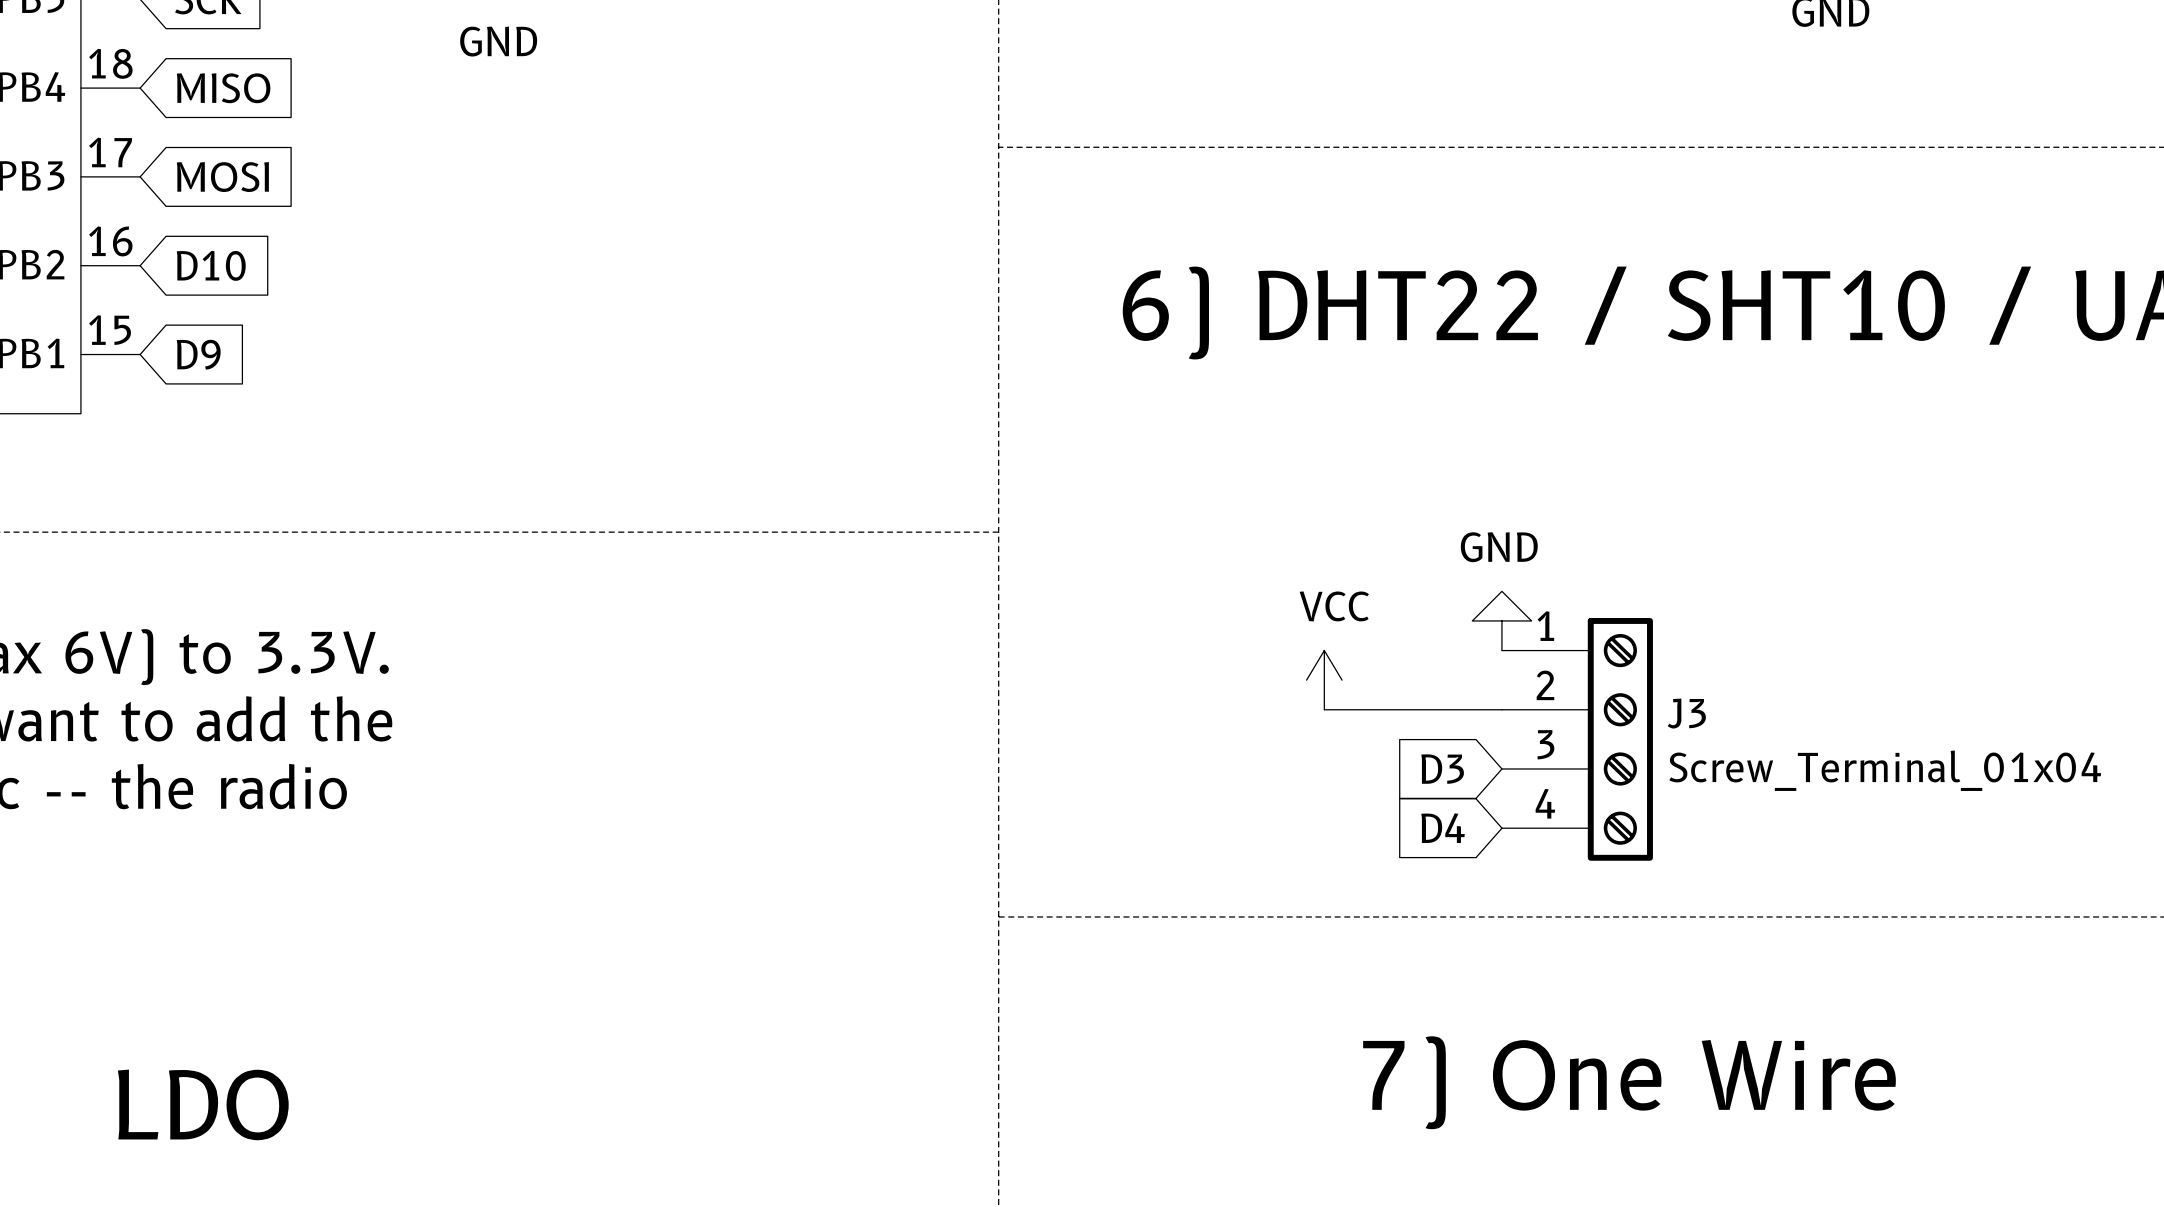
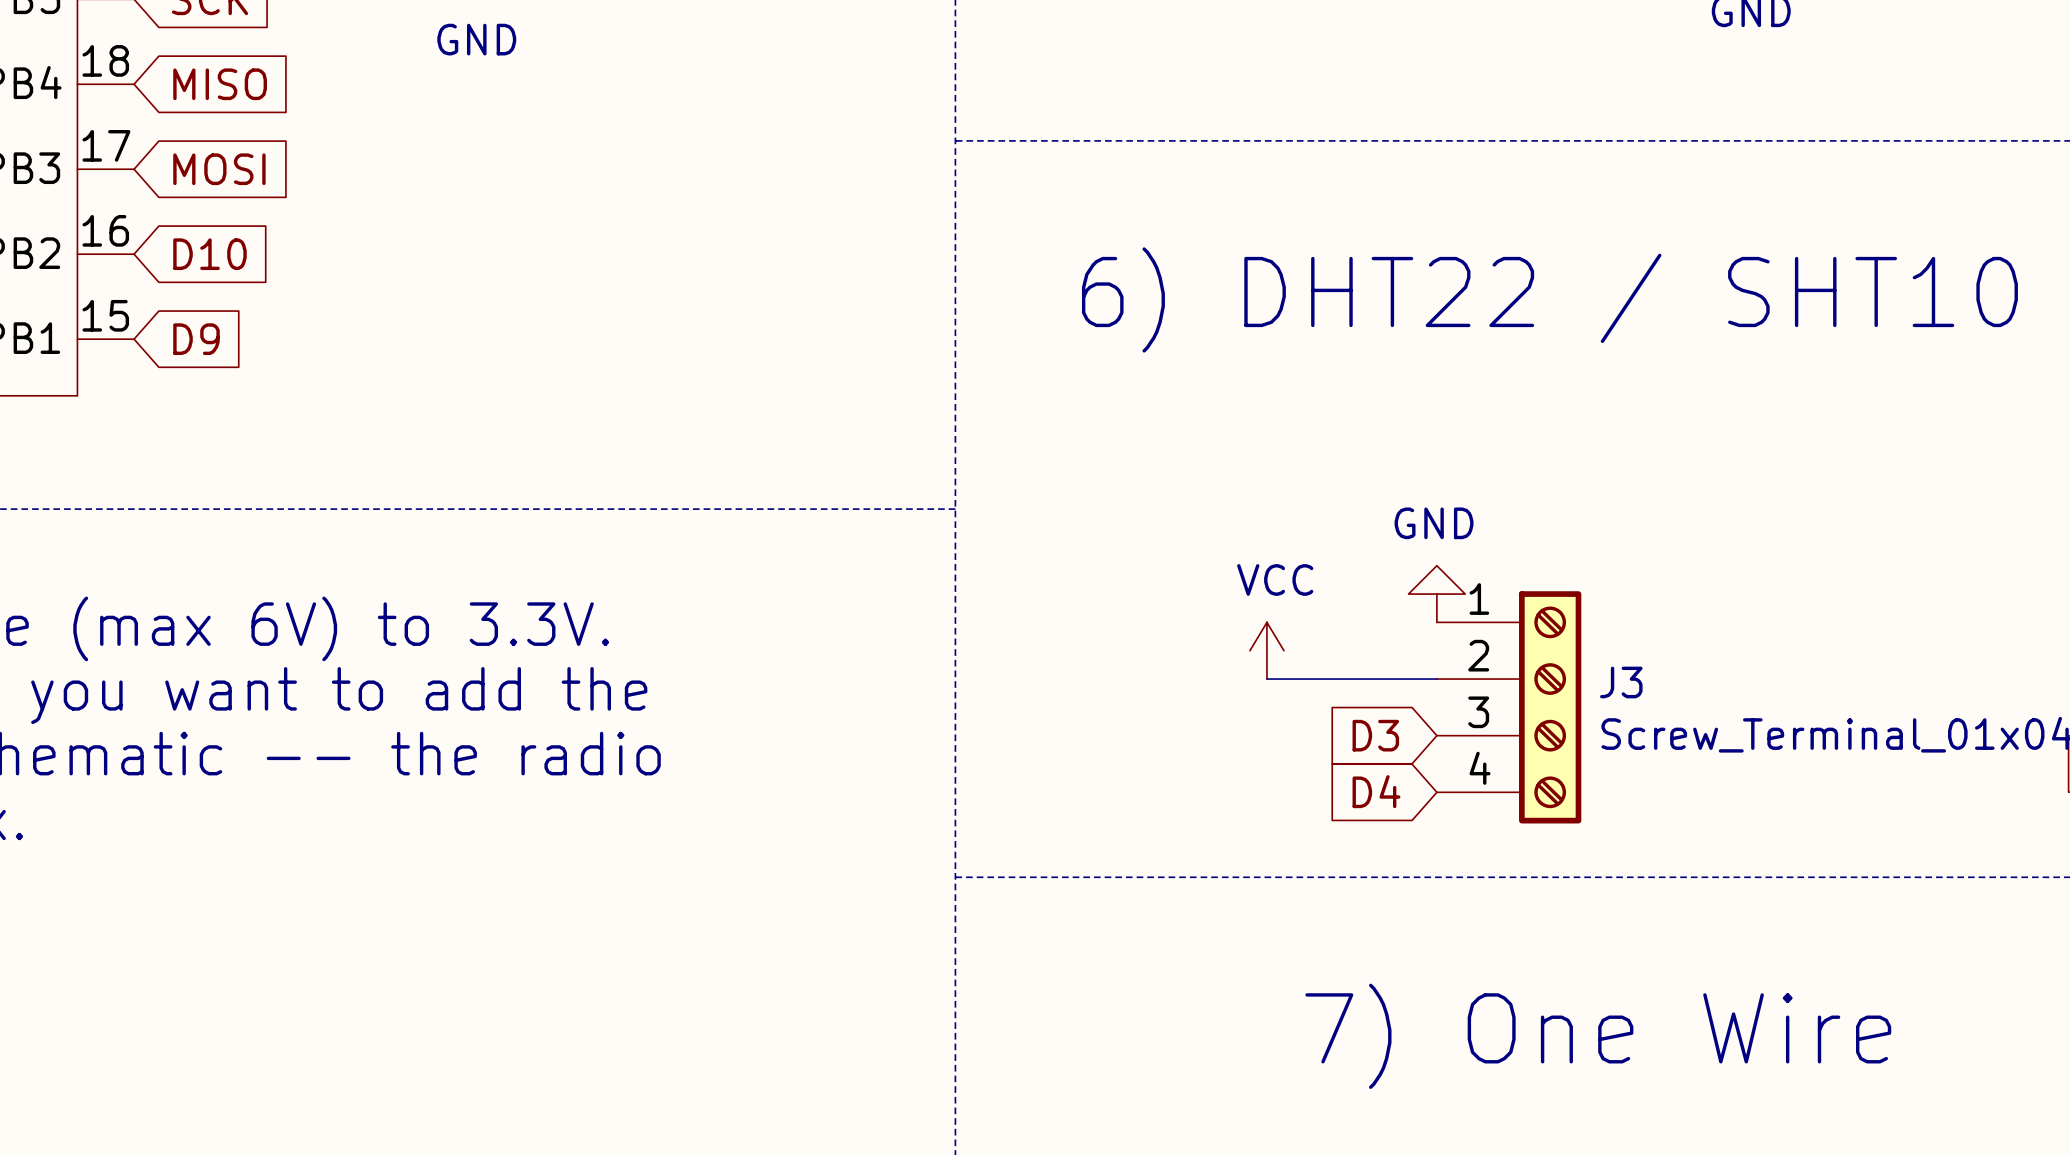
text: LDO (203, 1104) -> none

